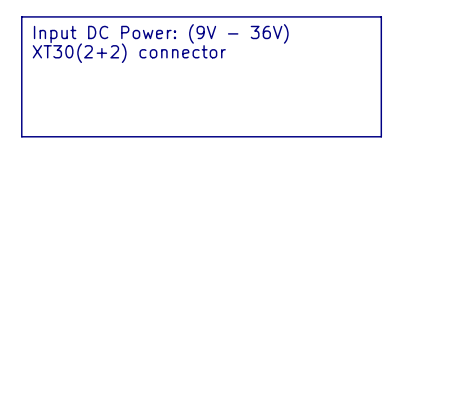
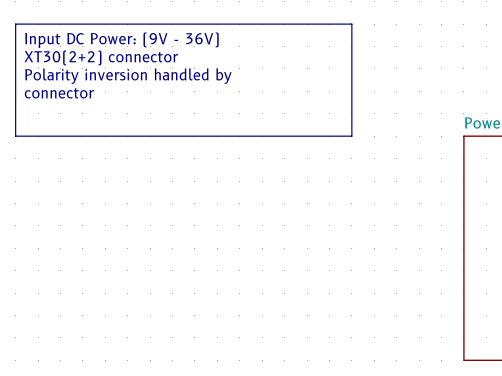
text: none -> Polarity inversion handled by (128, 76)
text: none -> connector (59, 93)

